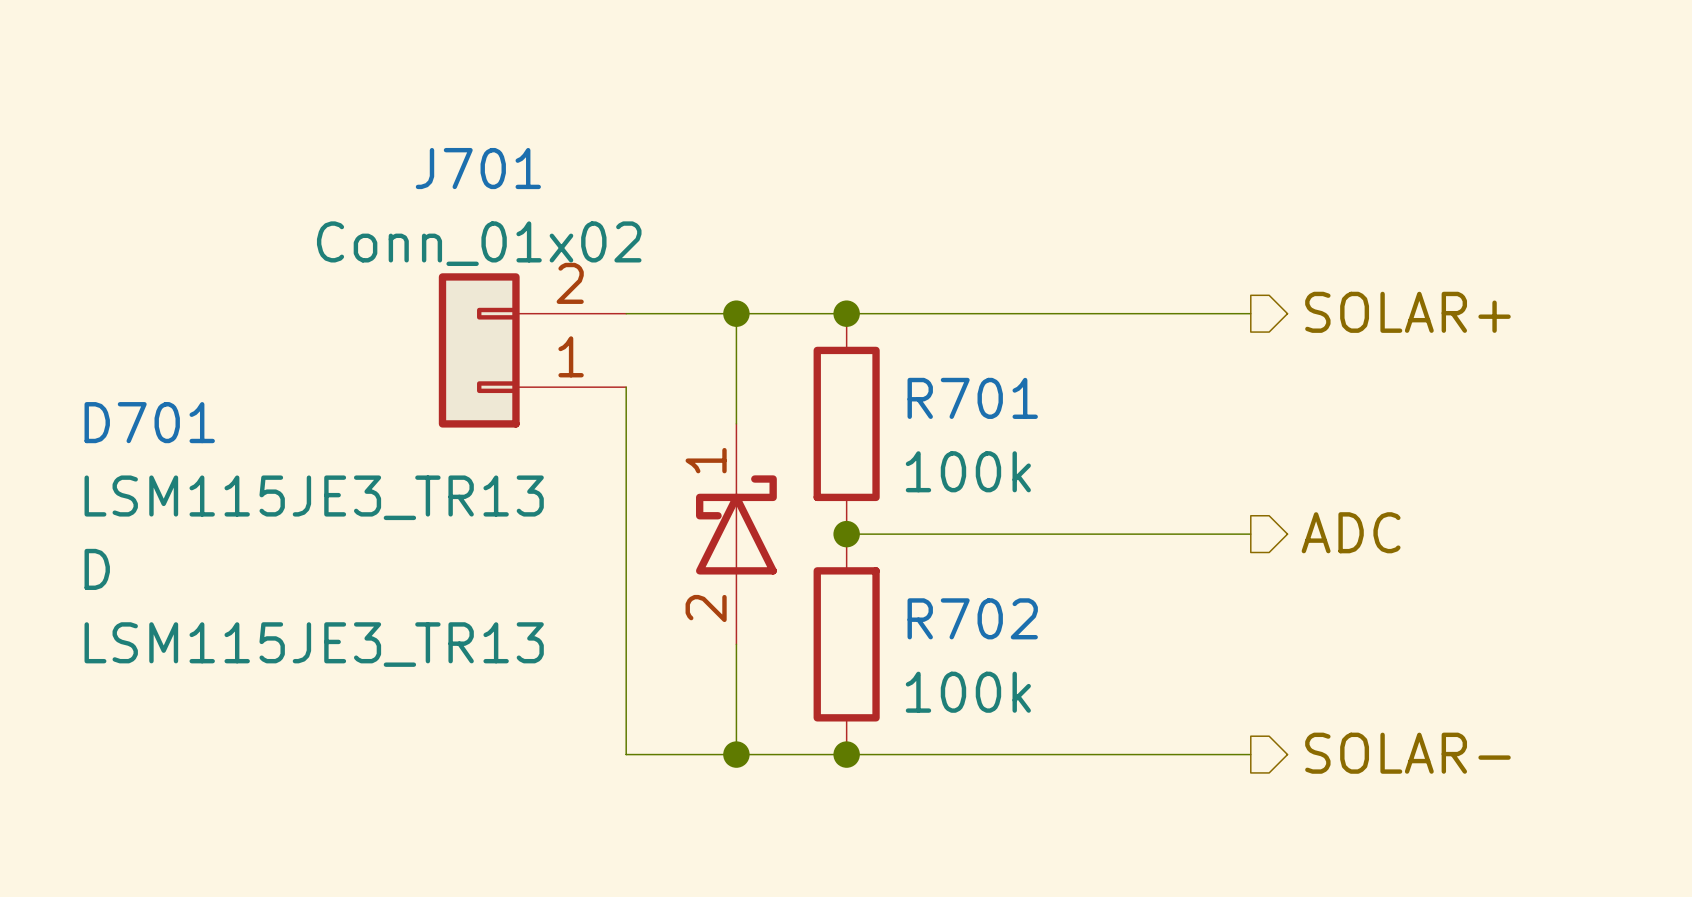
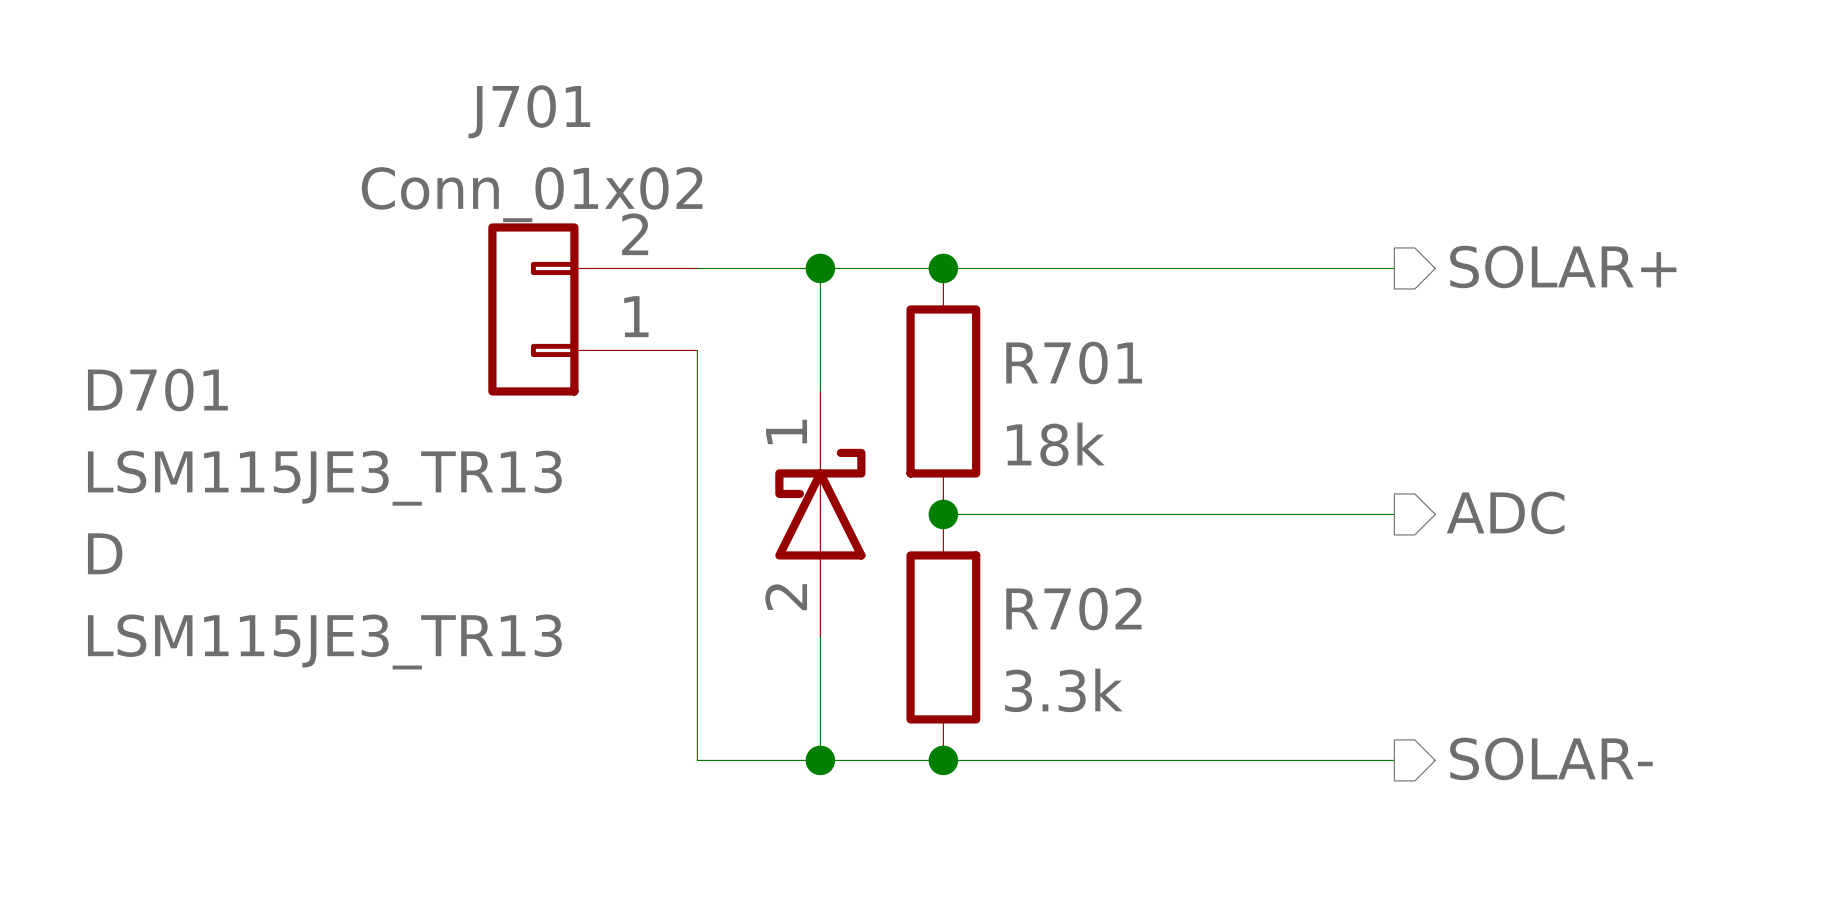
R701 value: 100k (968, 471) -> 18k (1055, 444)
R702 value: 100k (968, 692) -> 3.3k (1063, 690)

